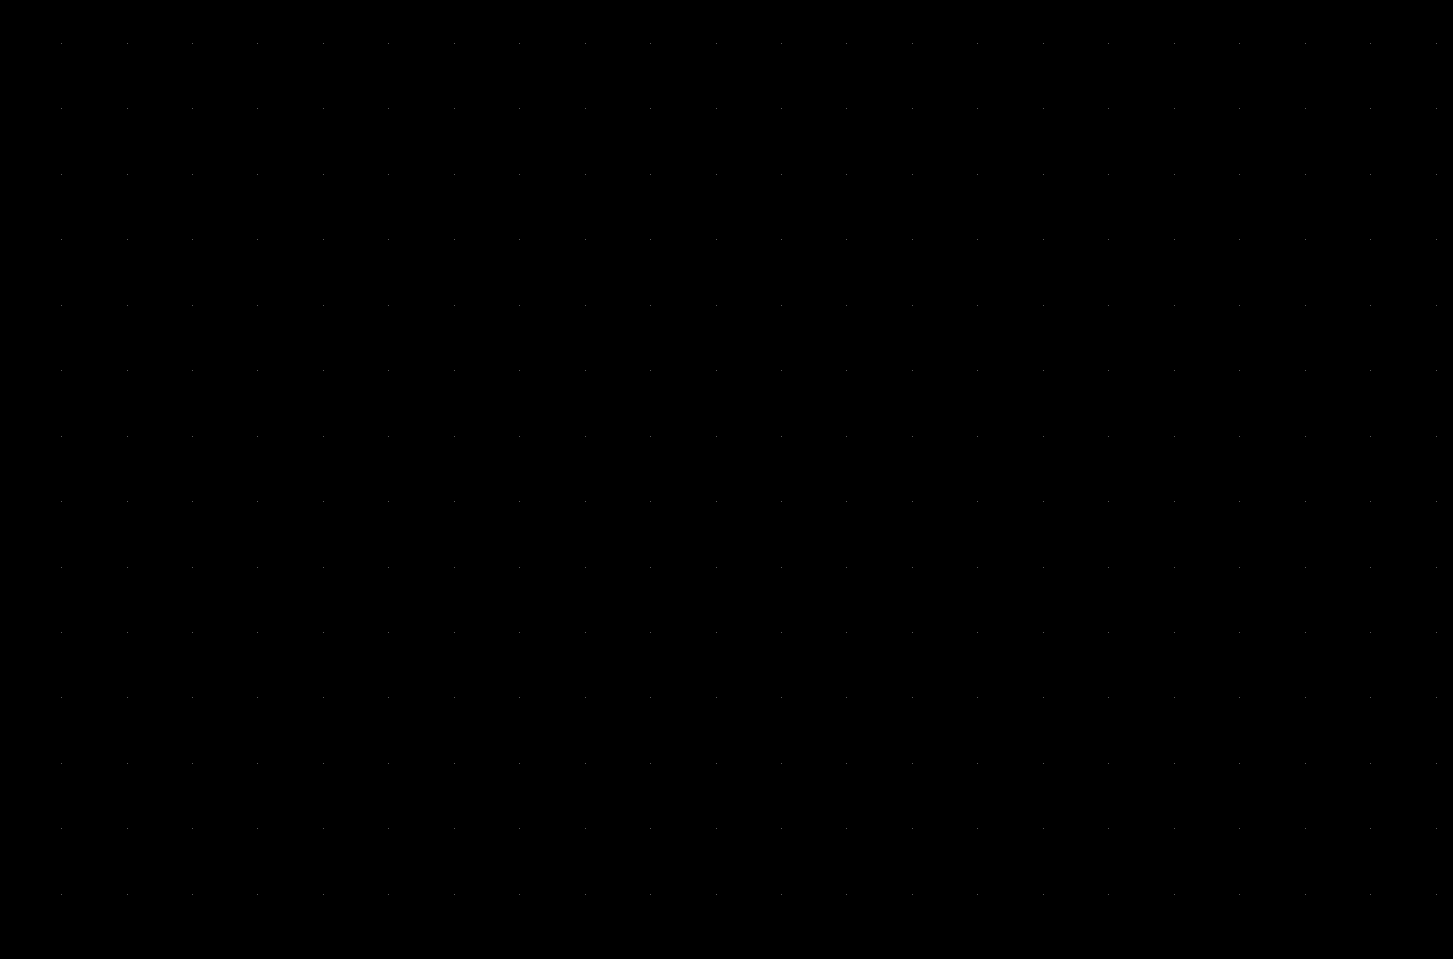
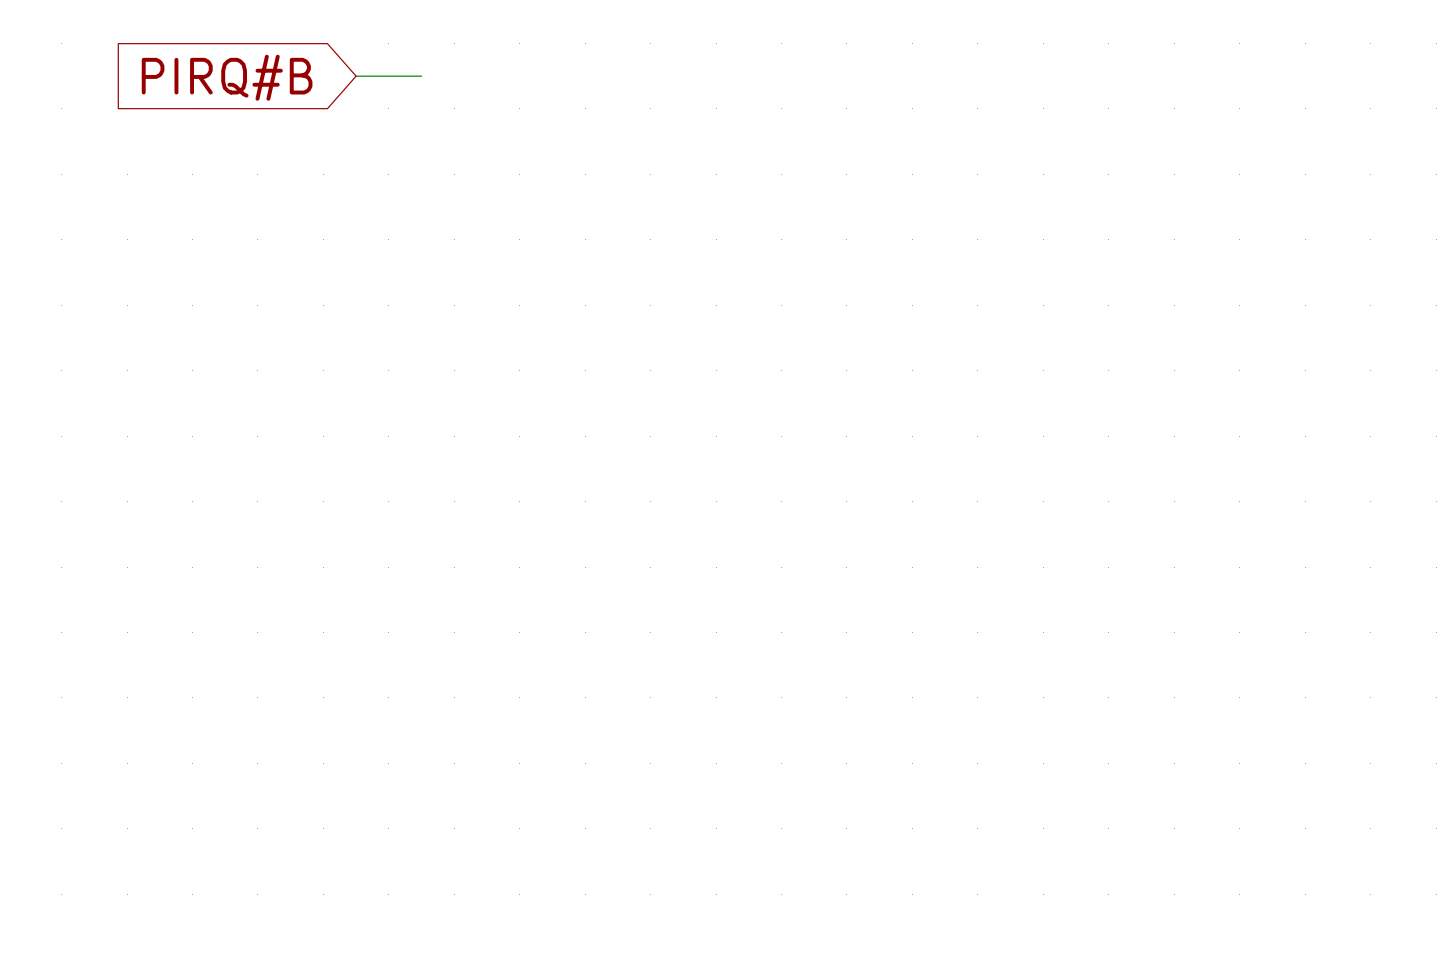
wire: none -> (356, 76) (421, 76)
global label: none -> PIRQ#B (227, 77)

